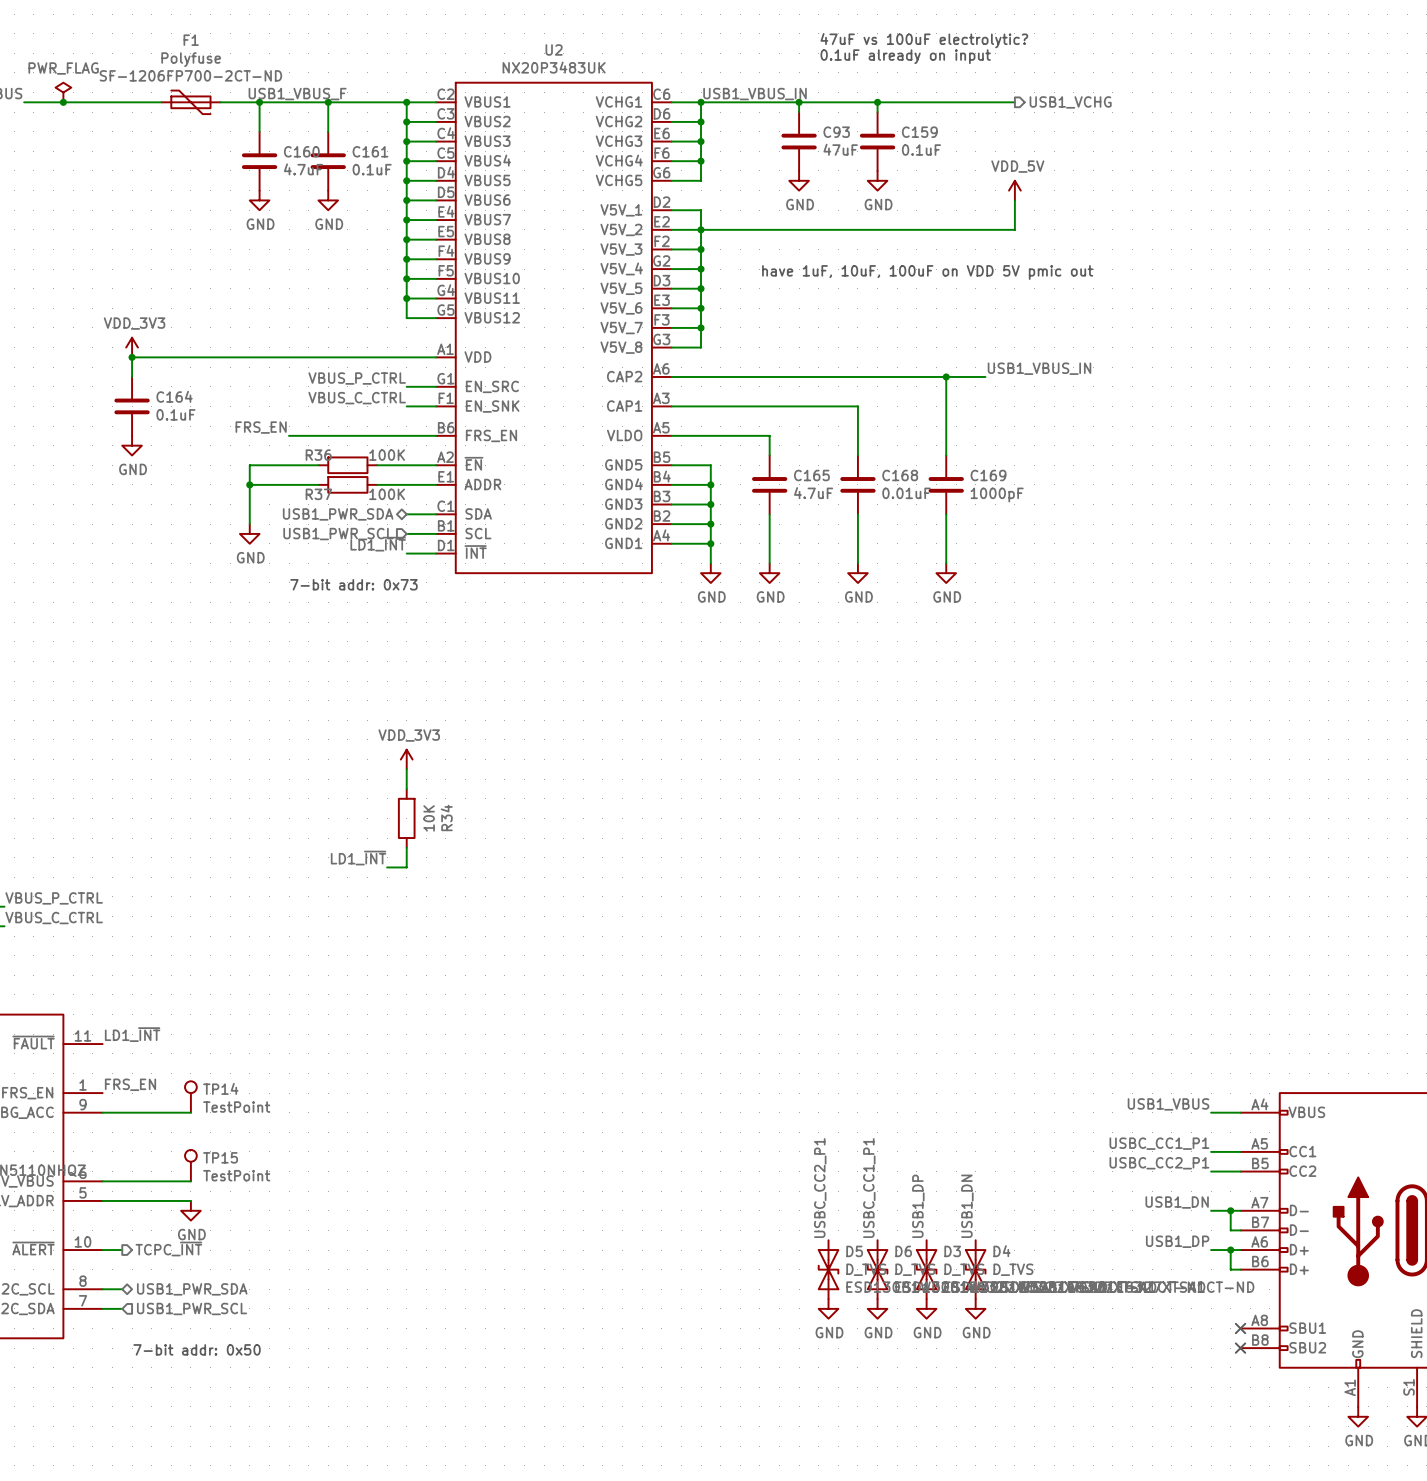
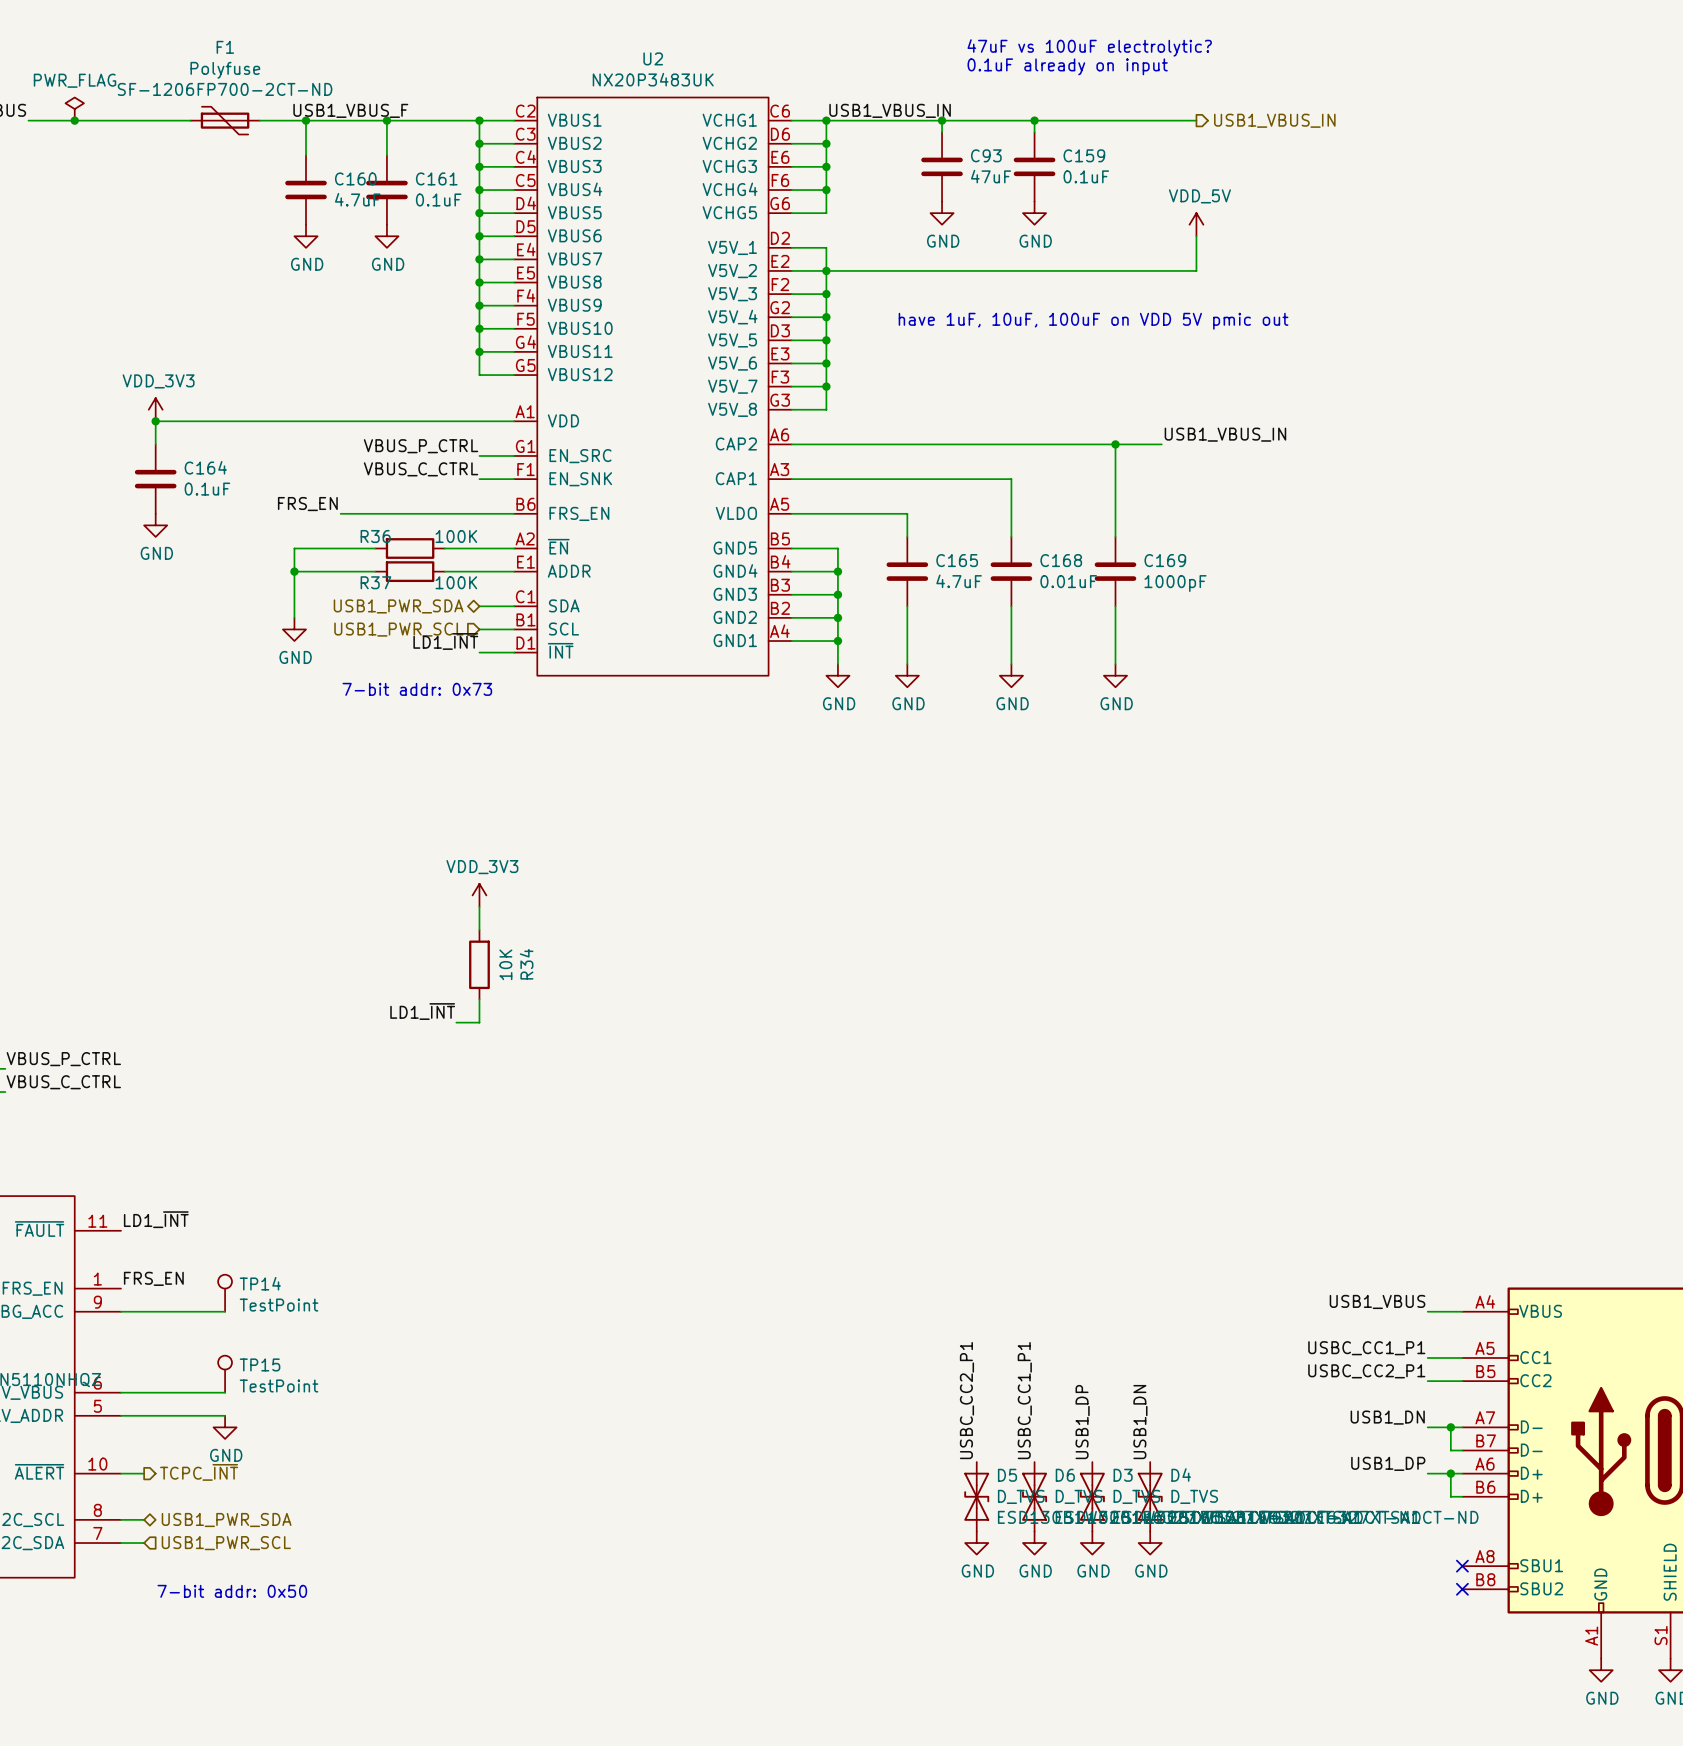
hierarchical label: USB1_VCHG (1070, 102) -> USB1_VBUS_IN (1274, 120)

